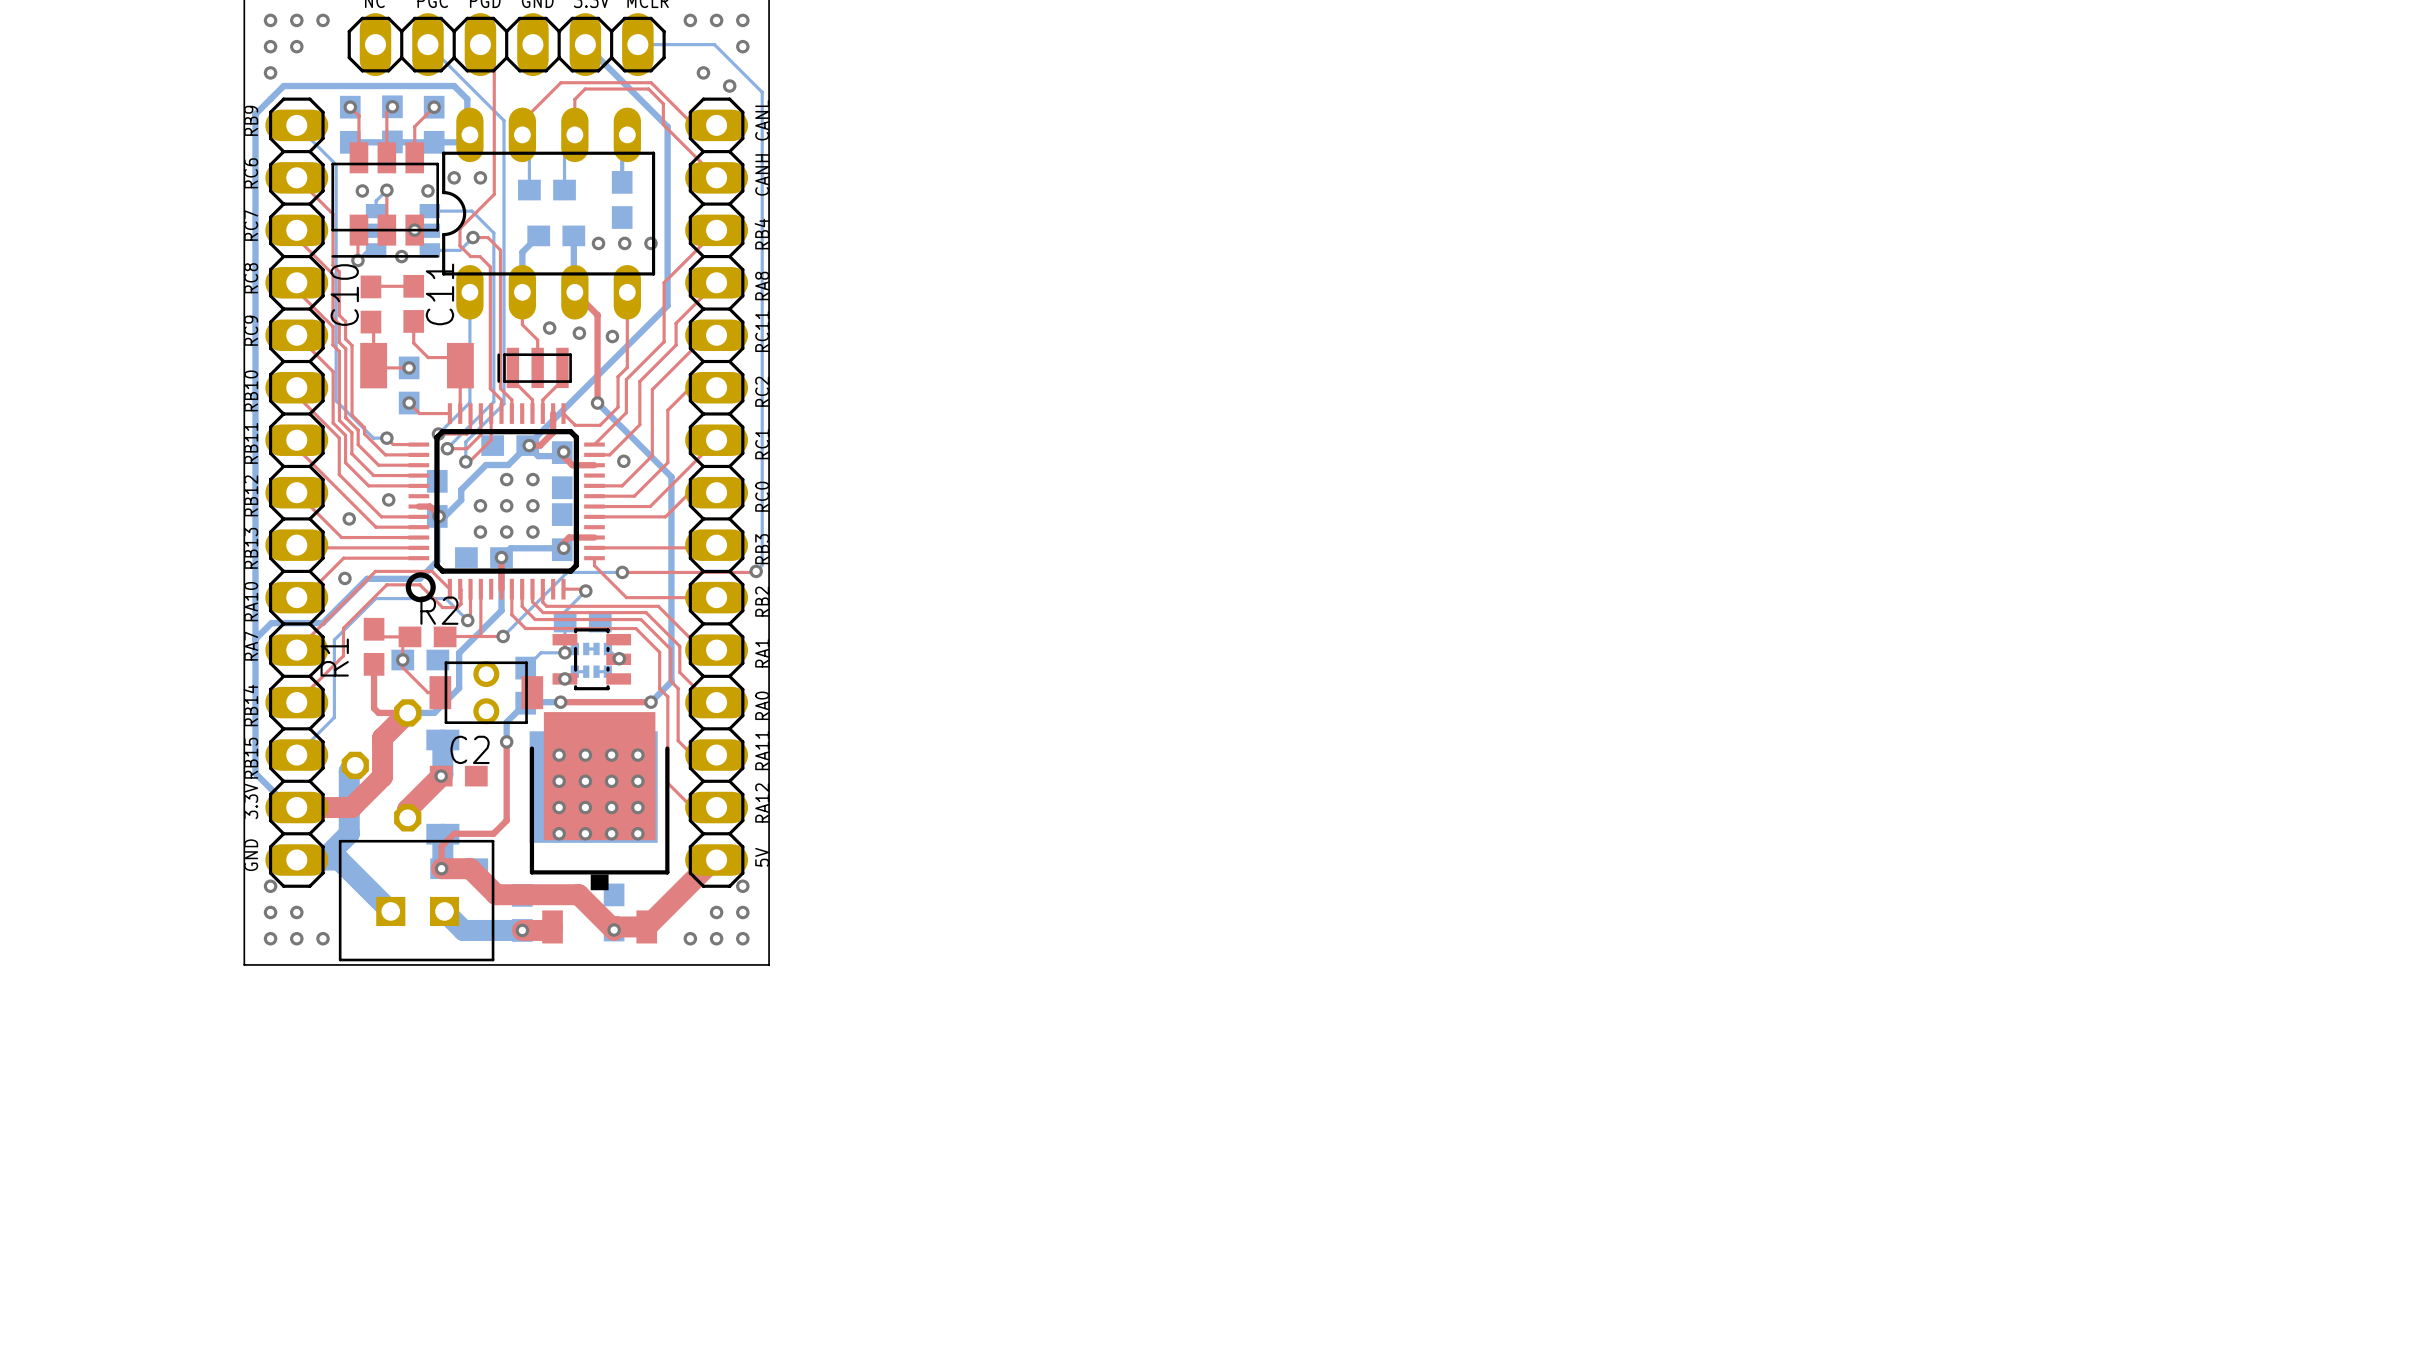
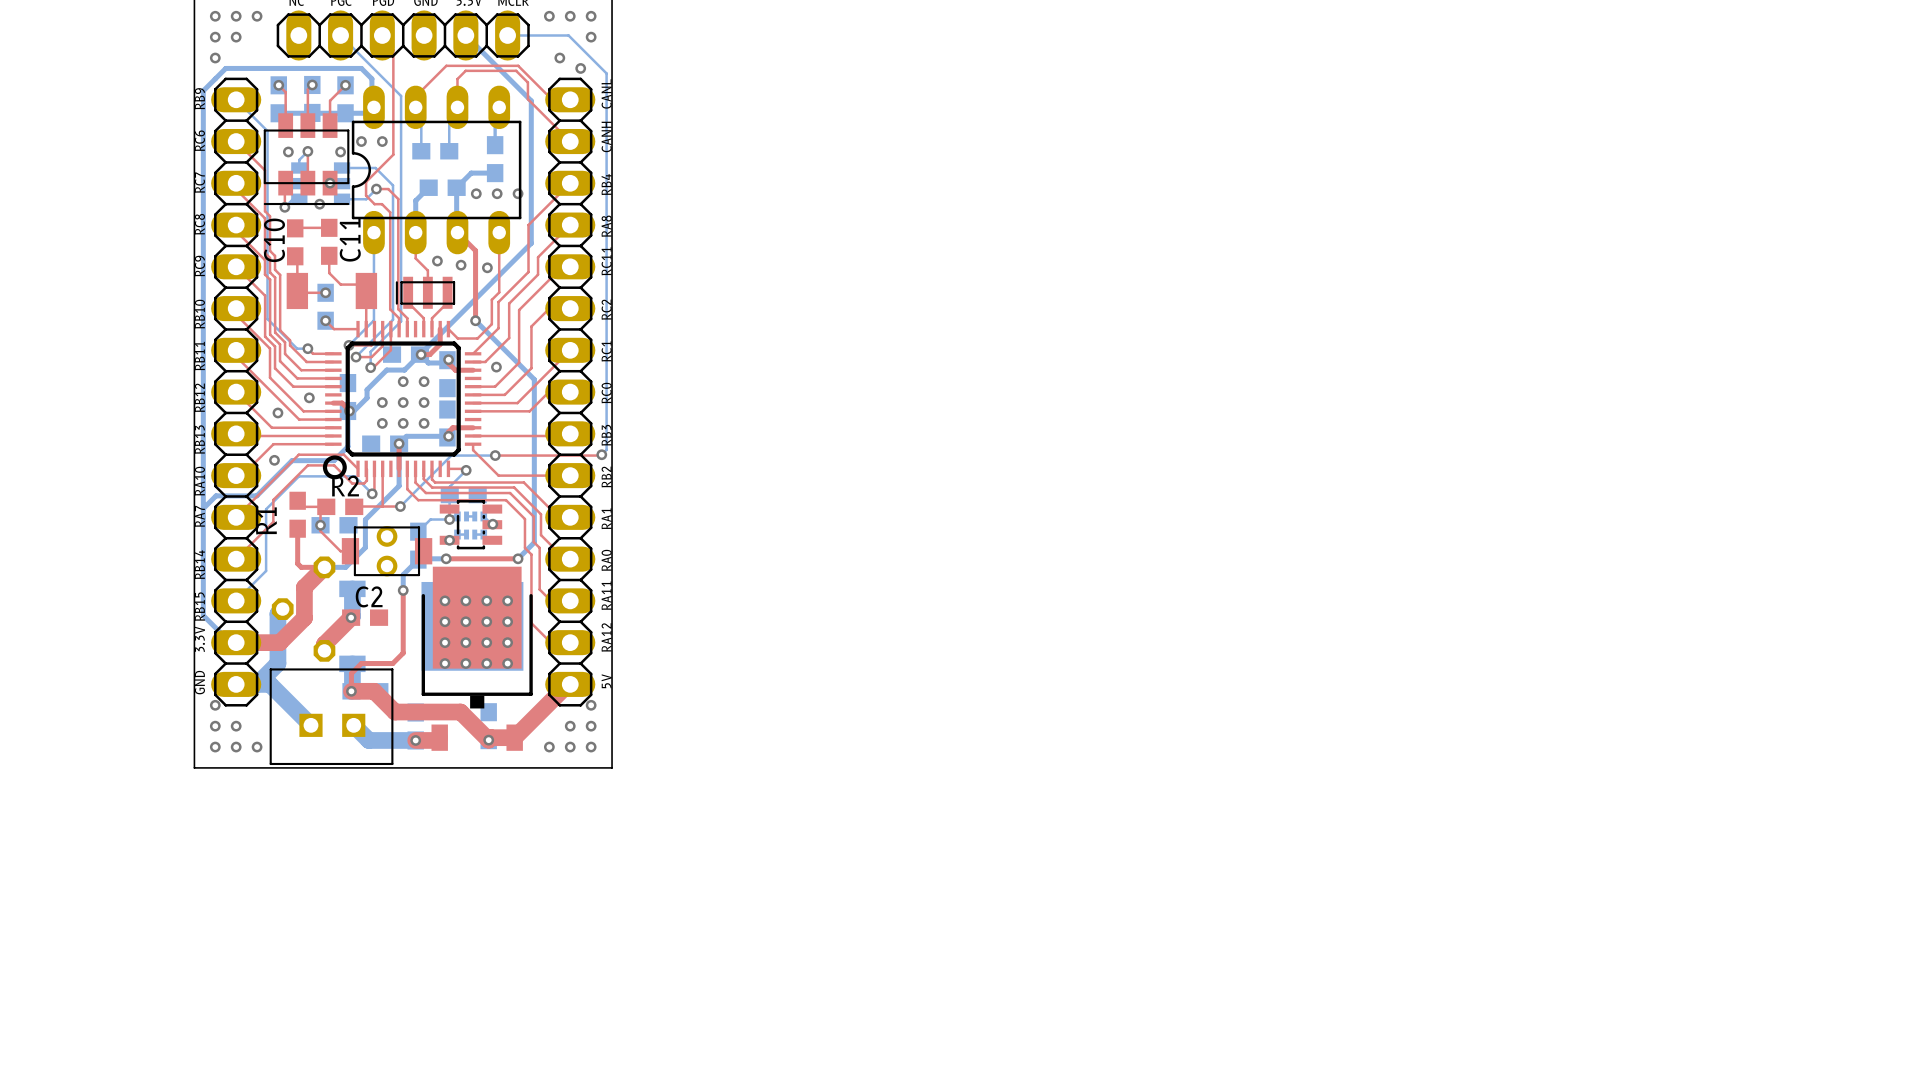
bottom track: none -> (495, 173) (471, 173) (456, 187)

